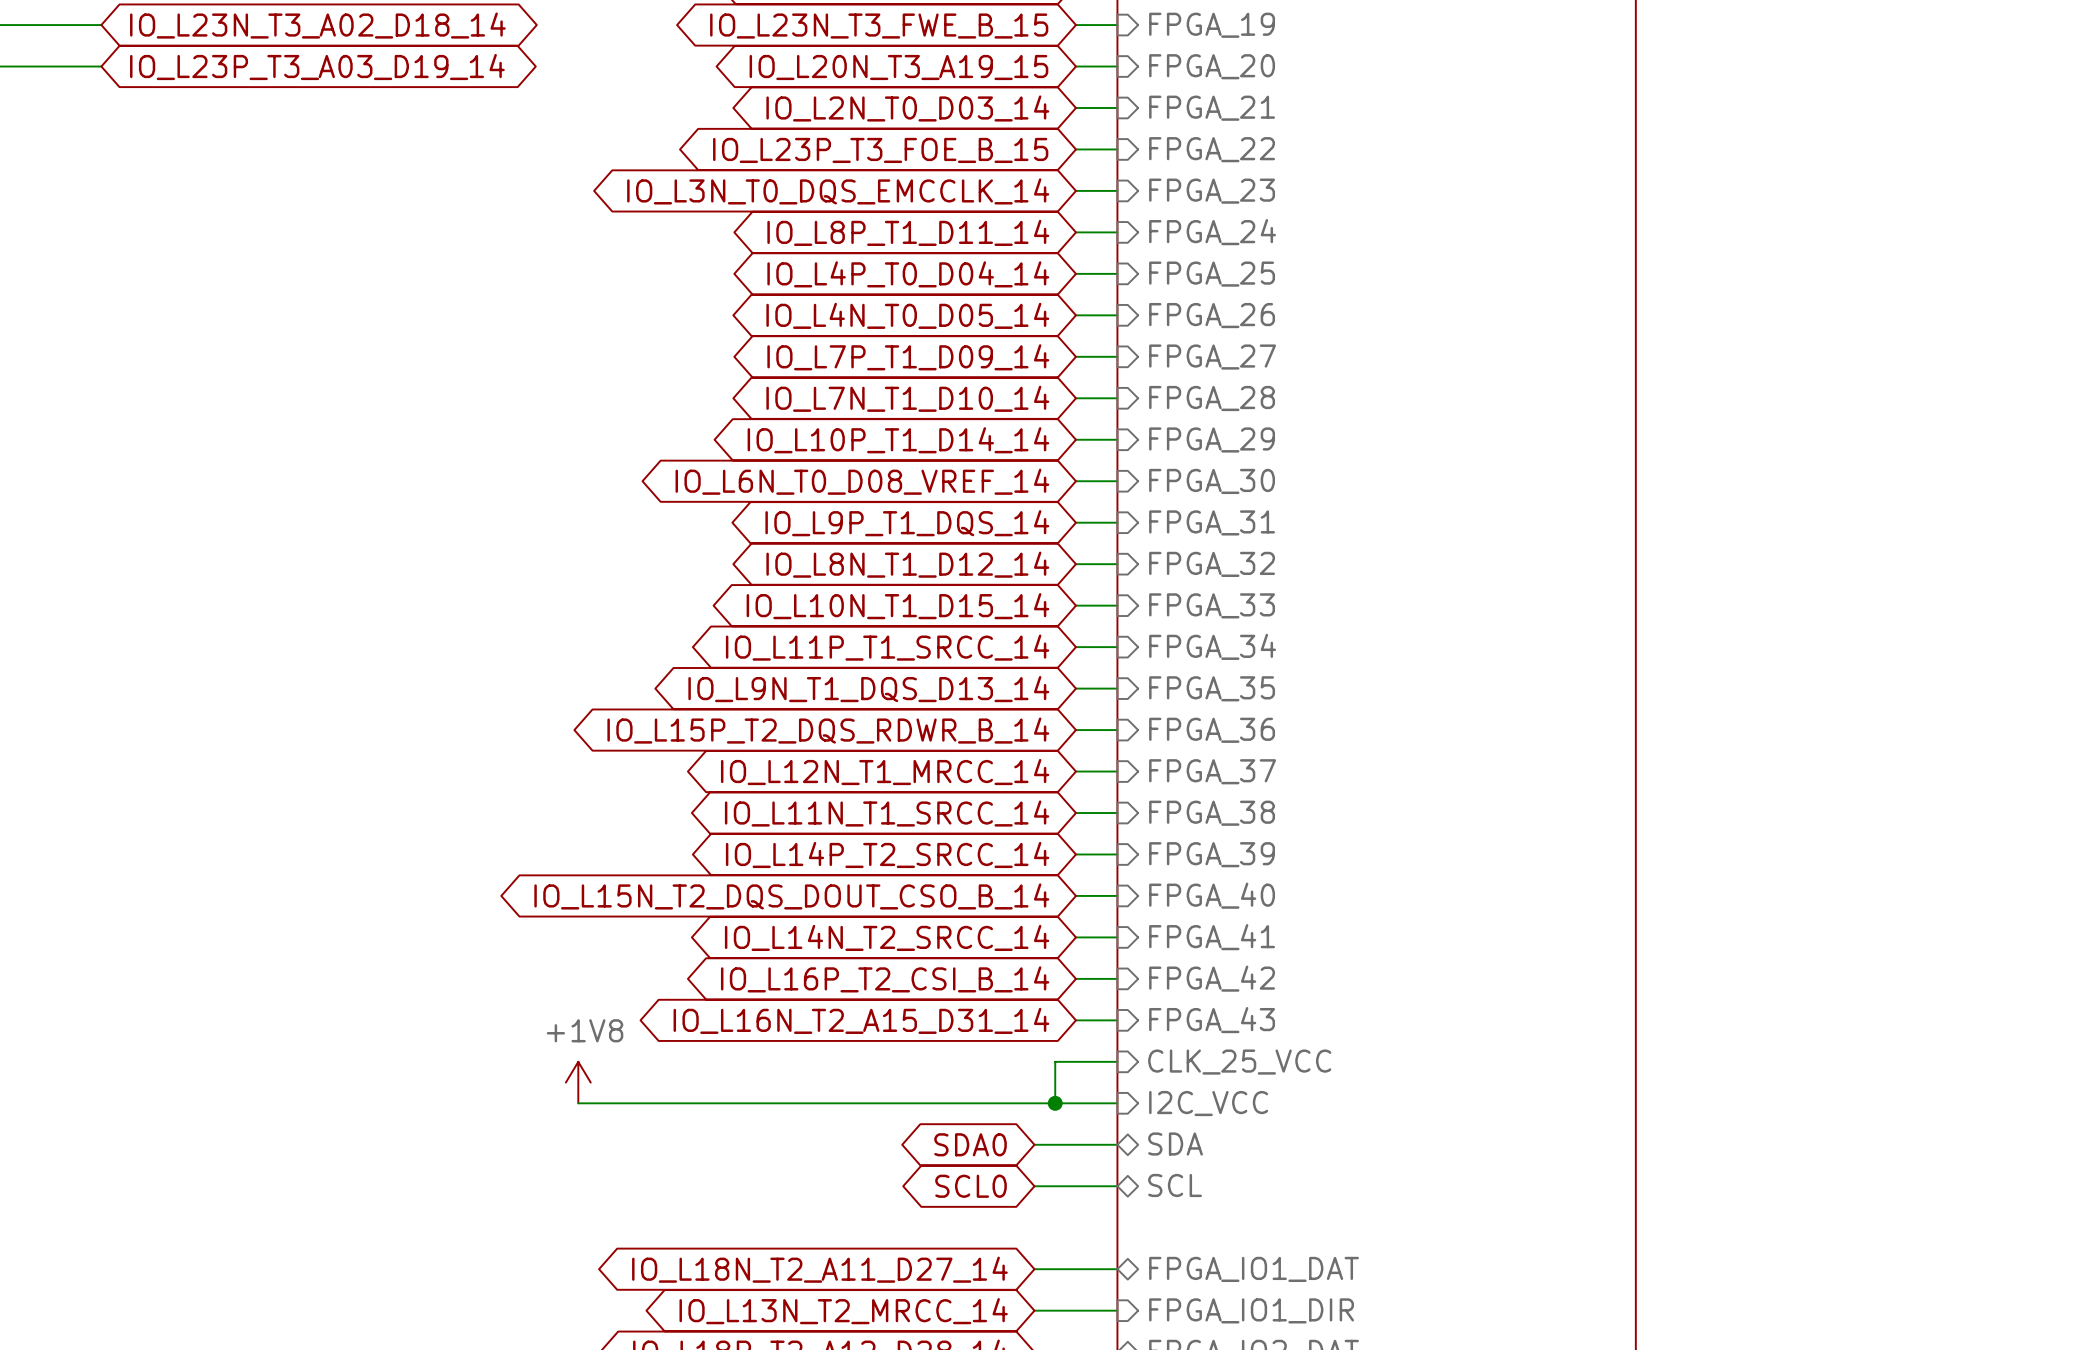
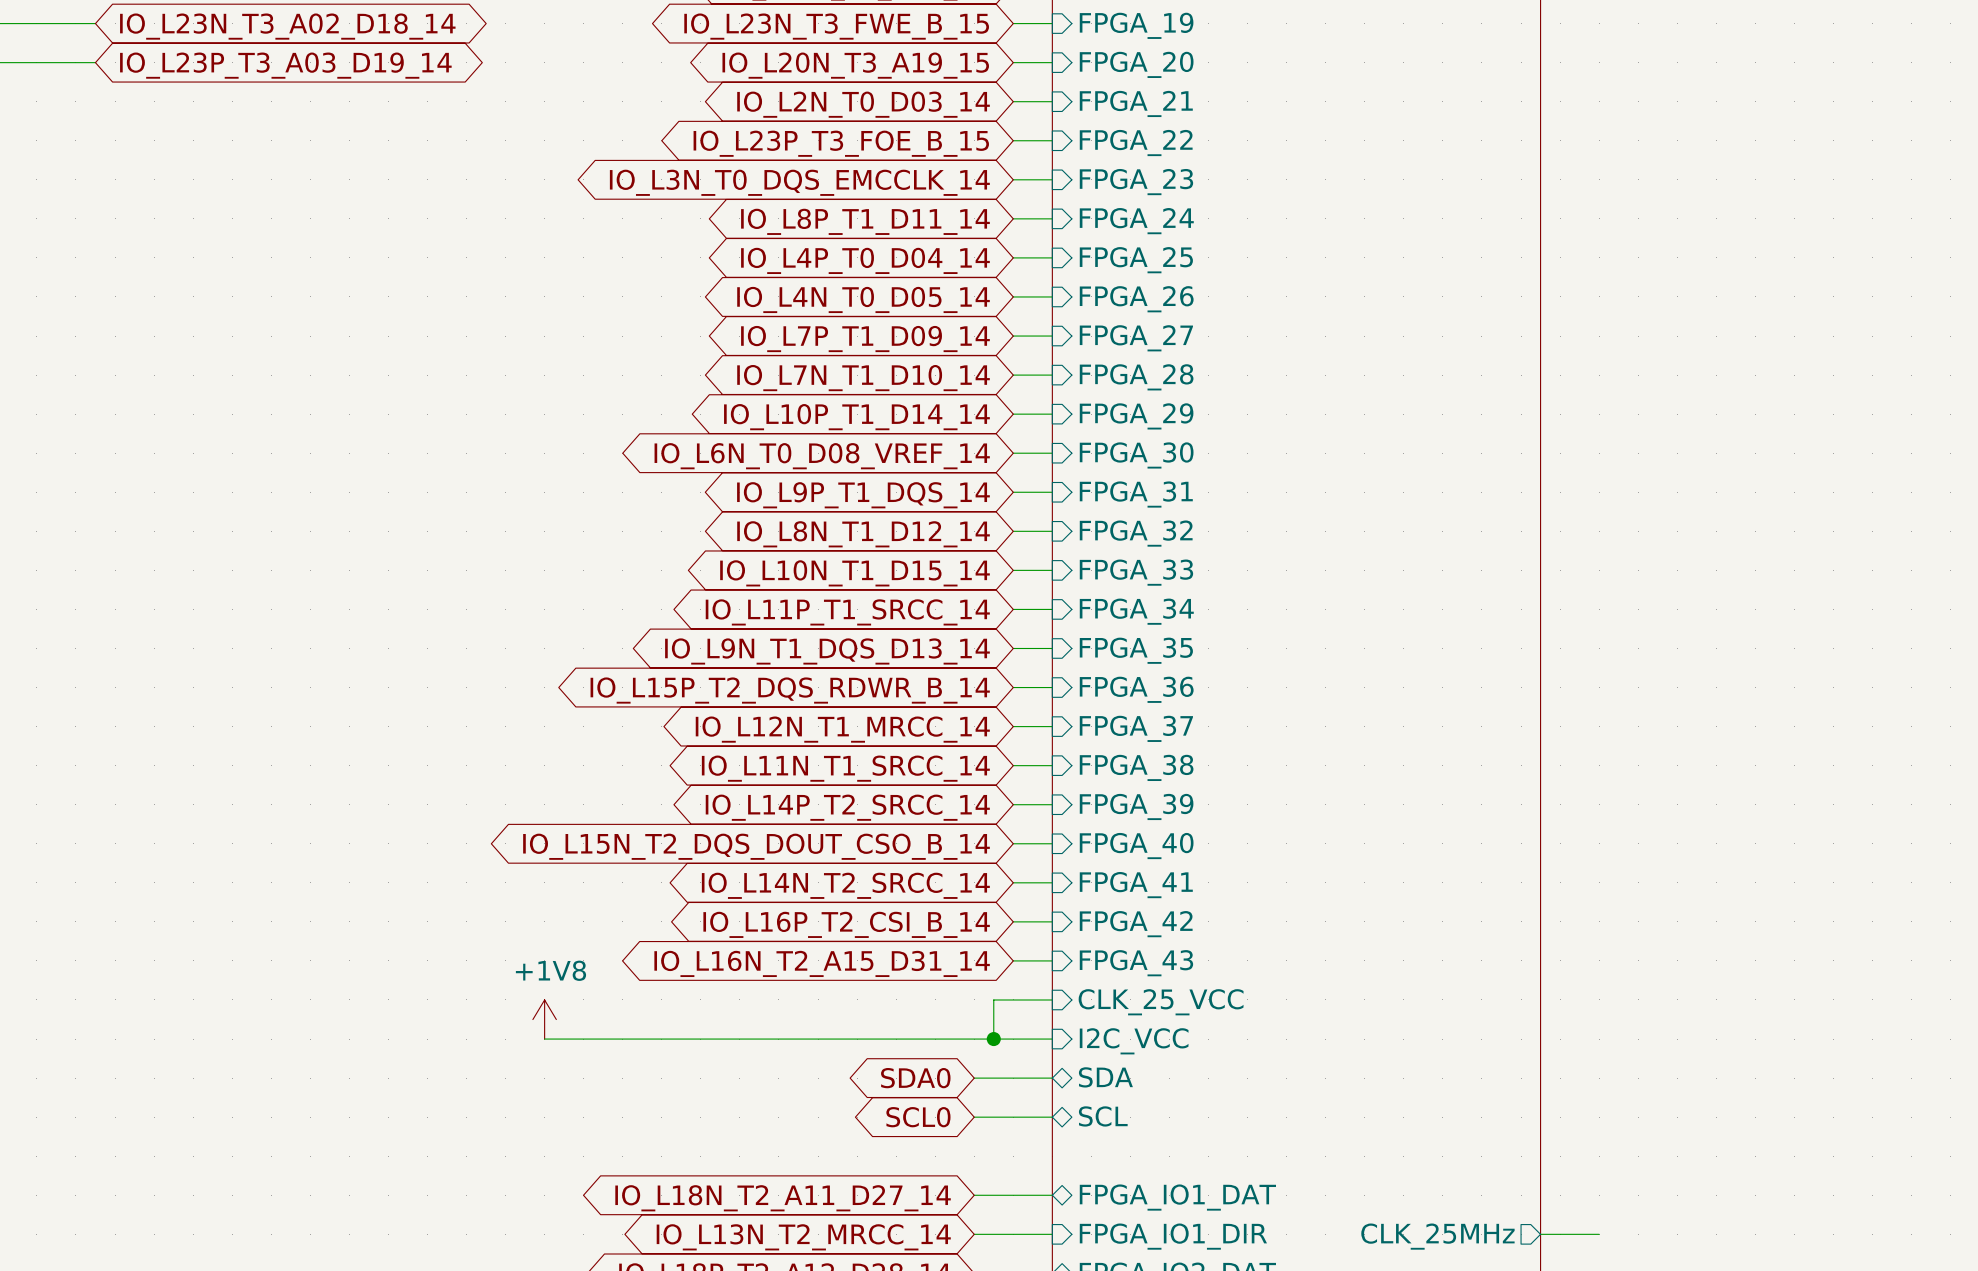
sheet pin: none -> CLK_25MHz (1437, 1236)
wire: none -> (1540, 1234) (1599, 1234)

